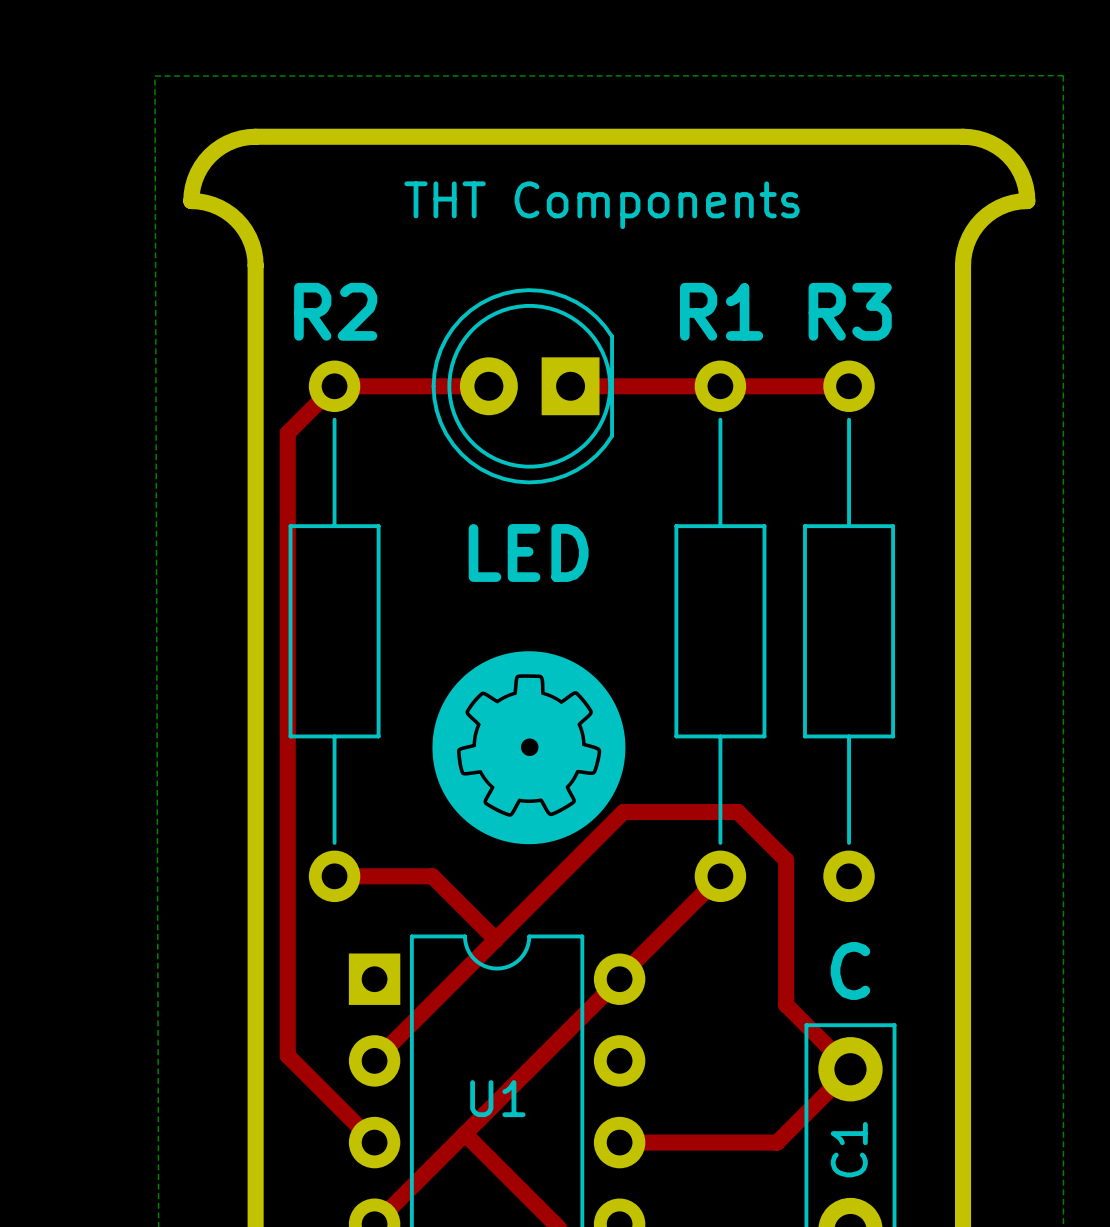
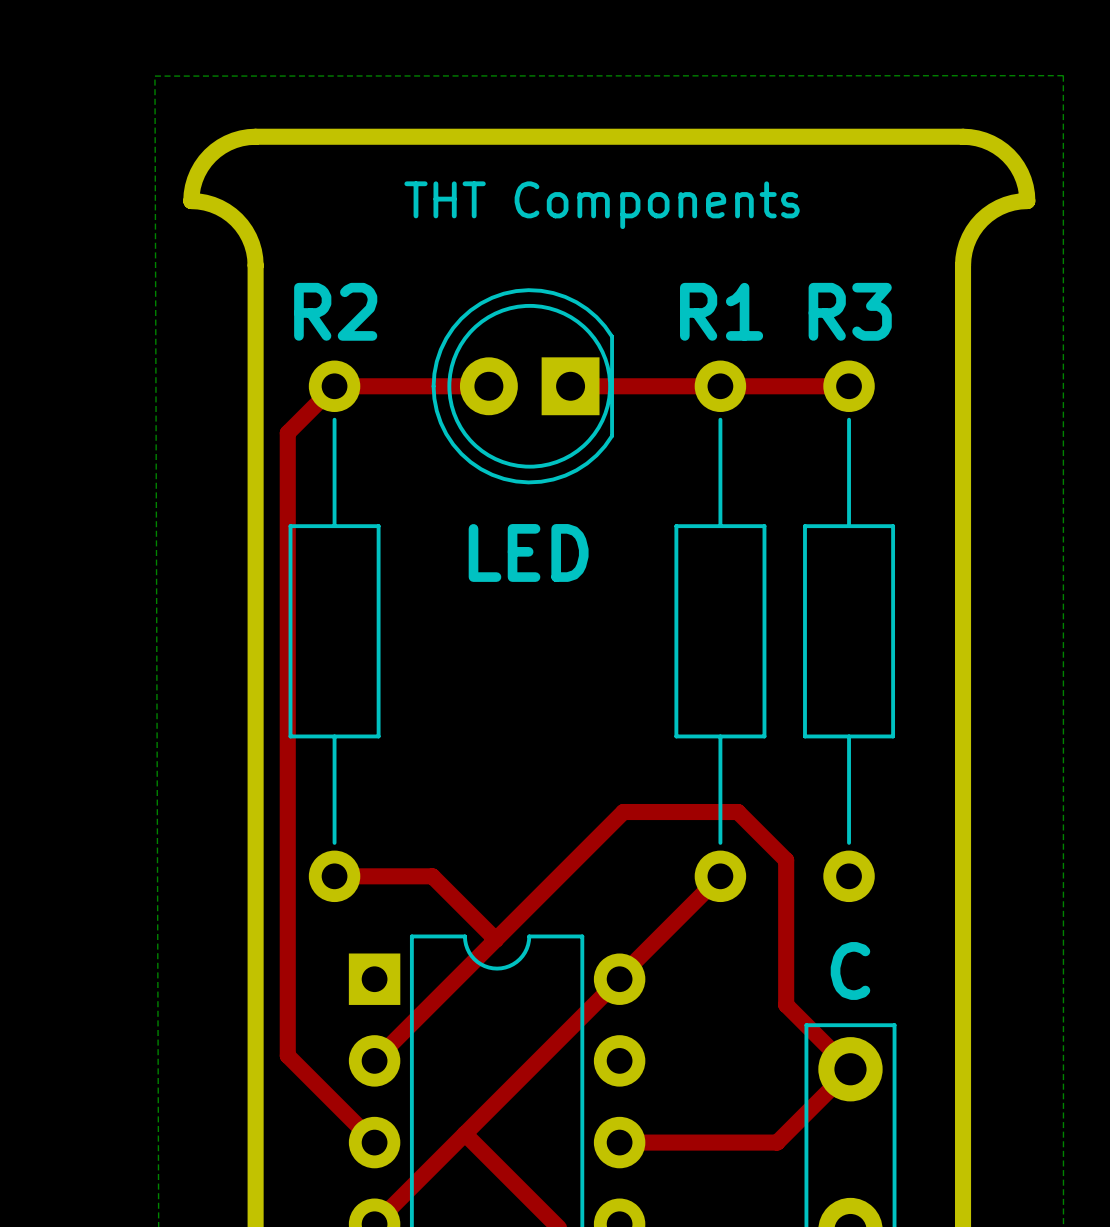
drawing: [432, 651, 626, 845] -> none
U1 name: U1 (497, 1098) -> none
C1 name: C1 (849, 1149) -> none

